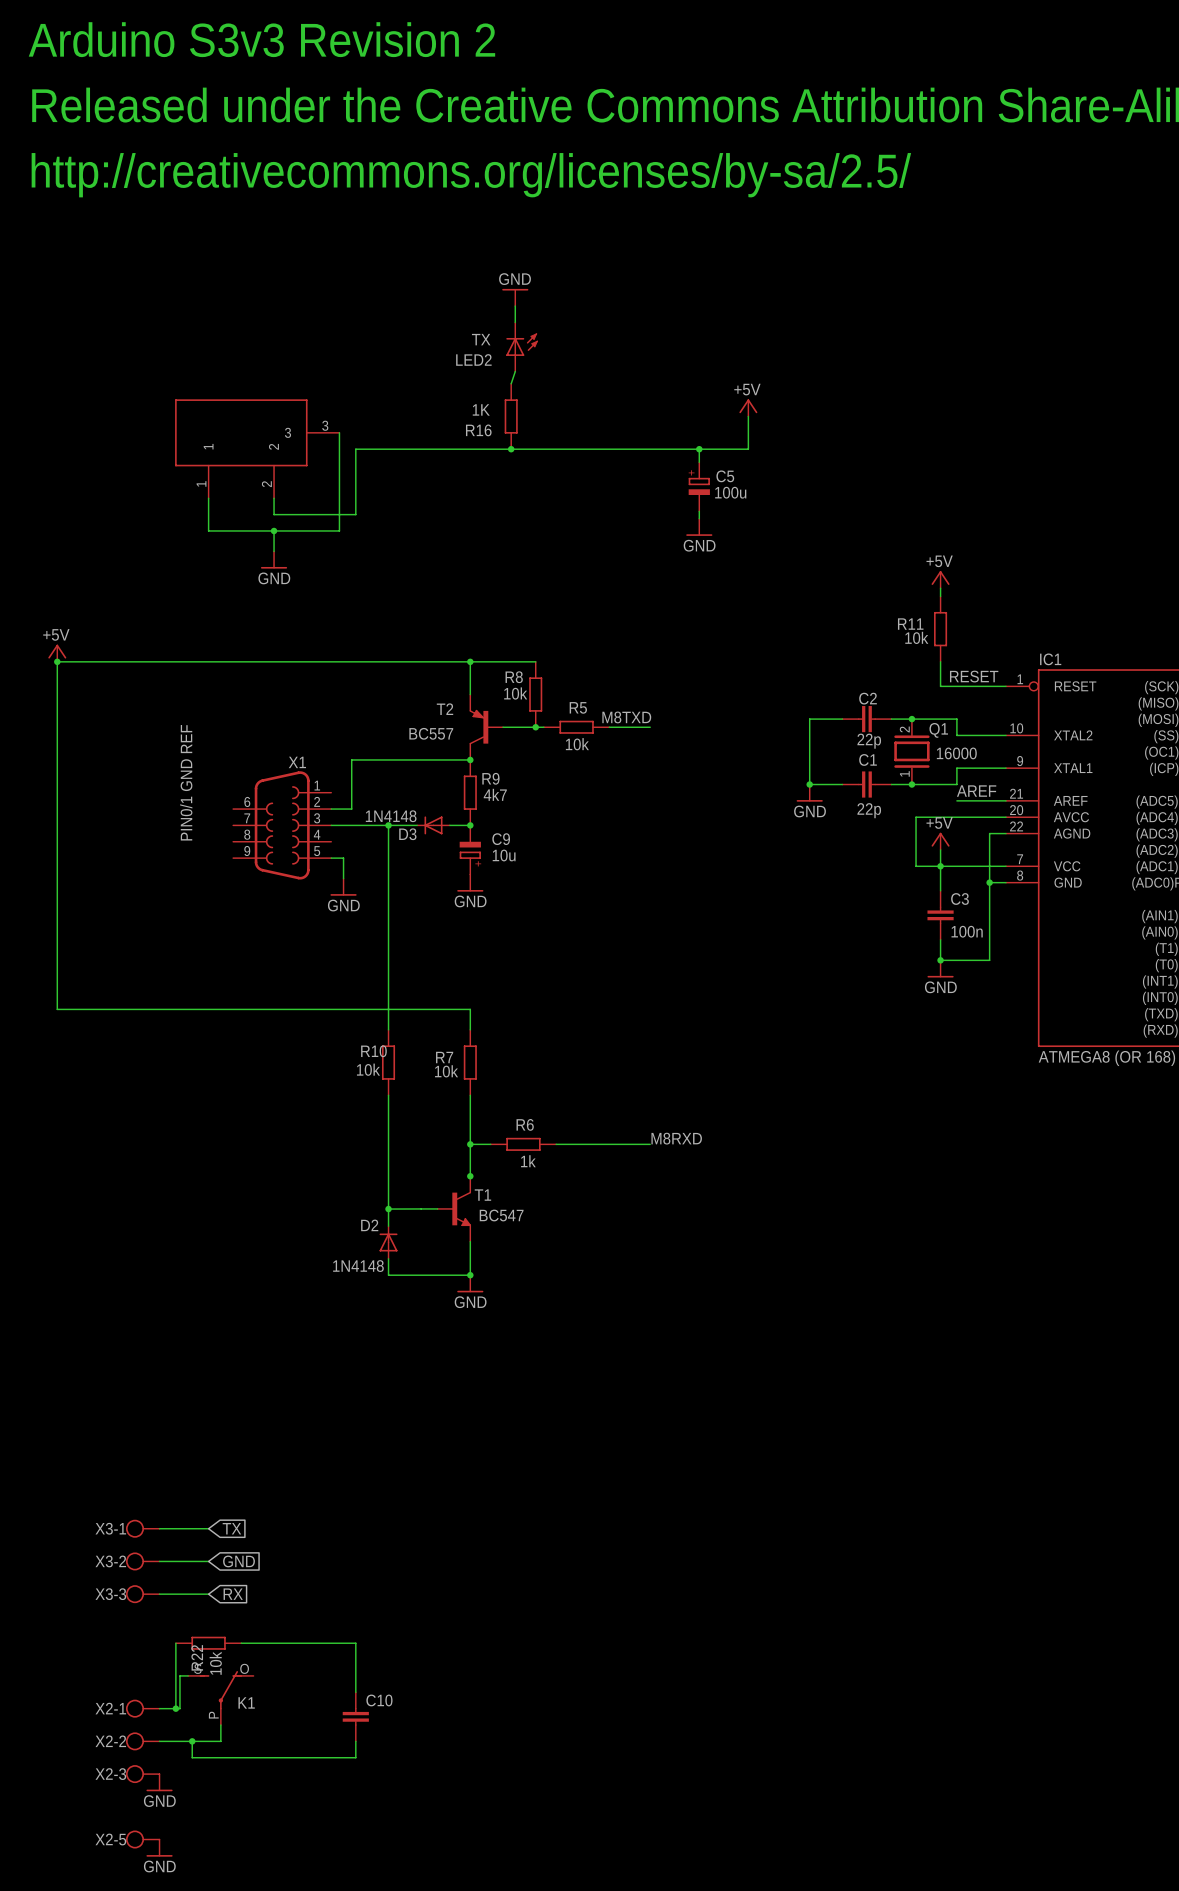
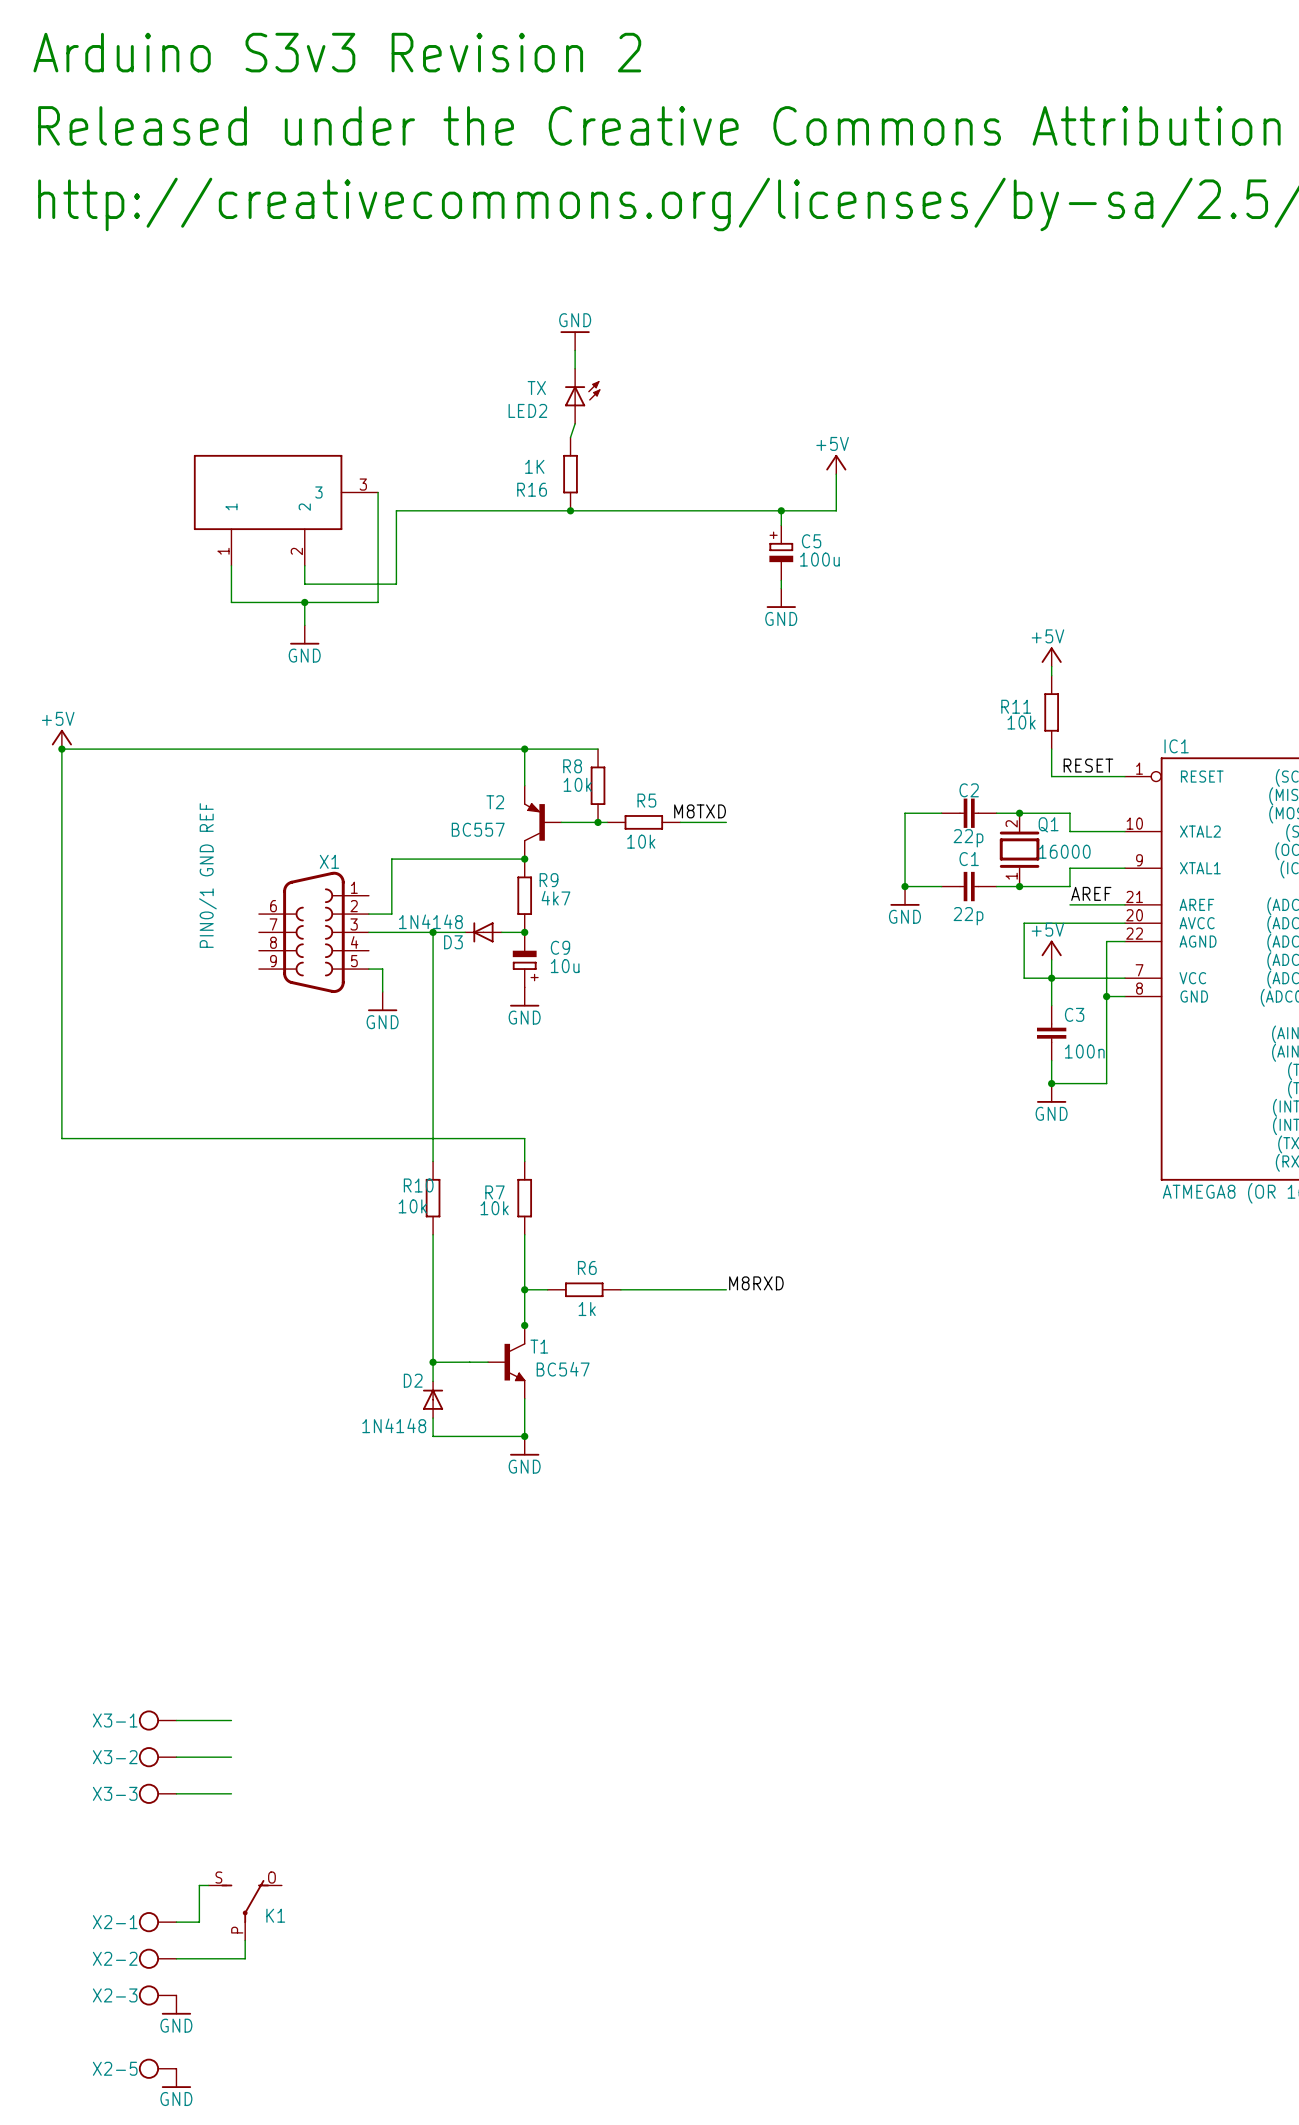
global label: TX (231, 1528) -> none
global label: GND (239, 1561) -> none
global label: RX (233, 1594) -> none
wire: (175, 1643) (175, 1708) -> none
R22: 10k (208, 1643) -> none
wire: (241, 1643) (355, 1643) (355, 1692) -> none
junction: (175, 1708) -> none
C10: (355, 1716) -> none
wire: (192, 1741) (192, 1757) (355, 1757) (355, 1741) -> none
junction: (192, 1741) -> none

